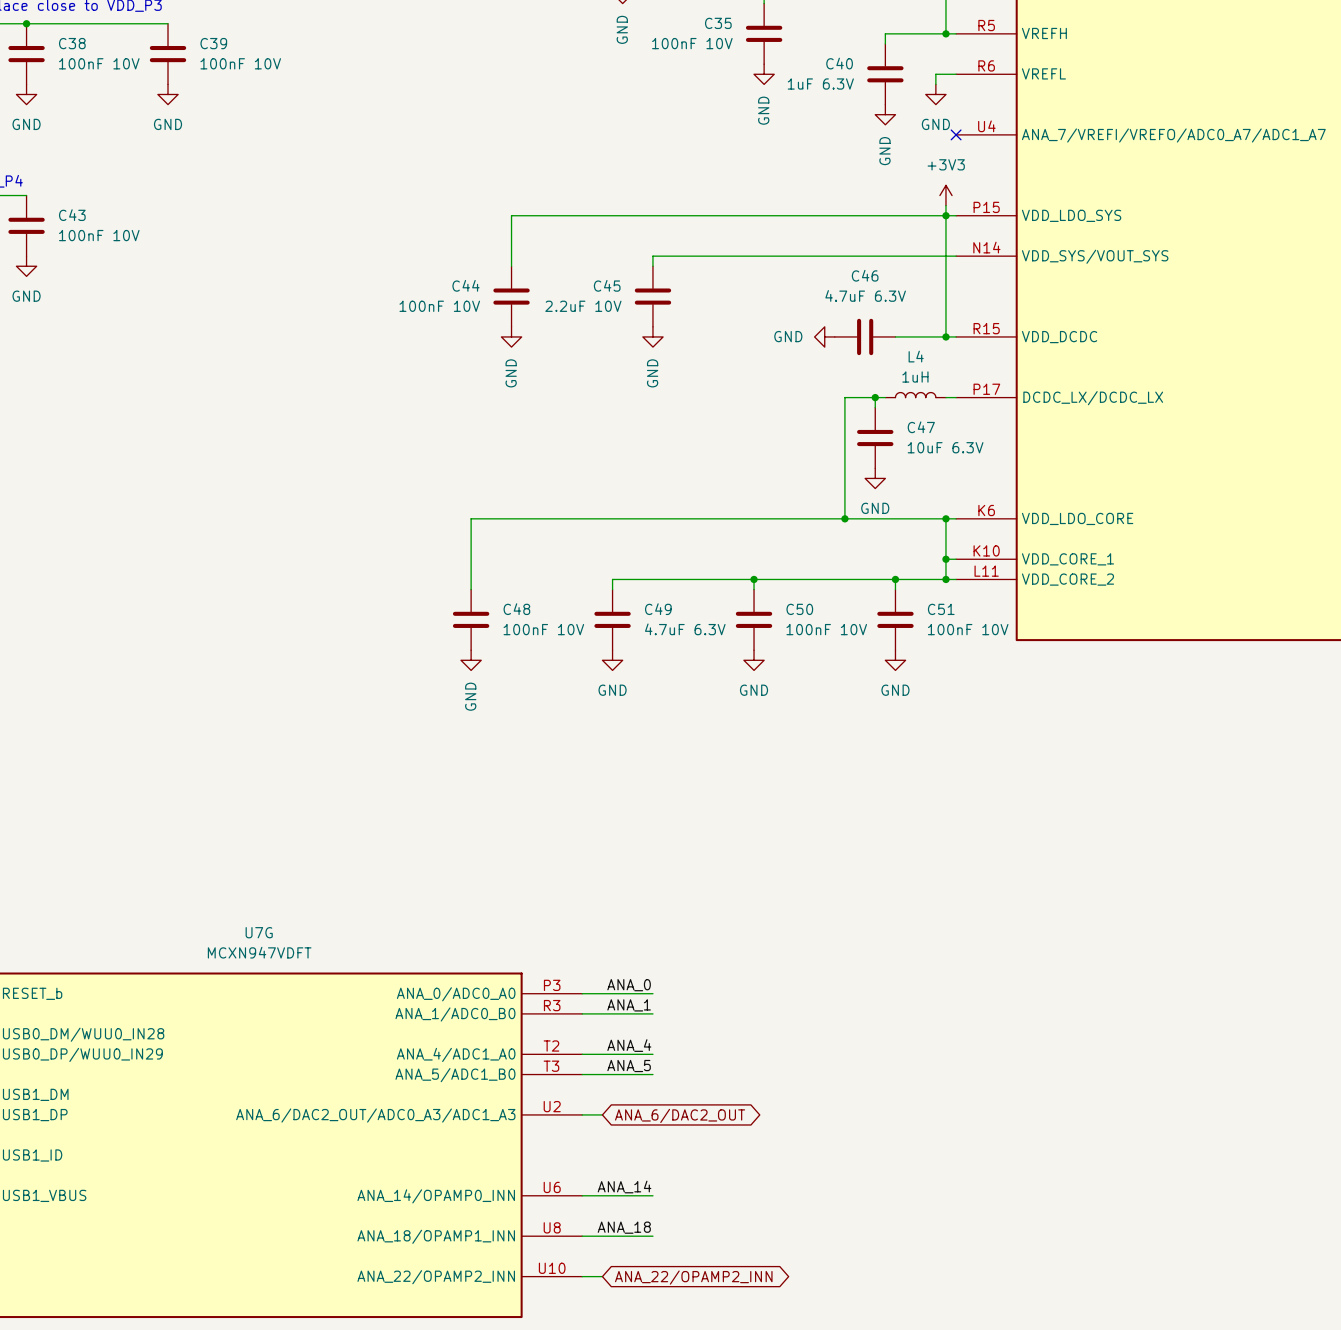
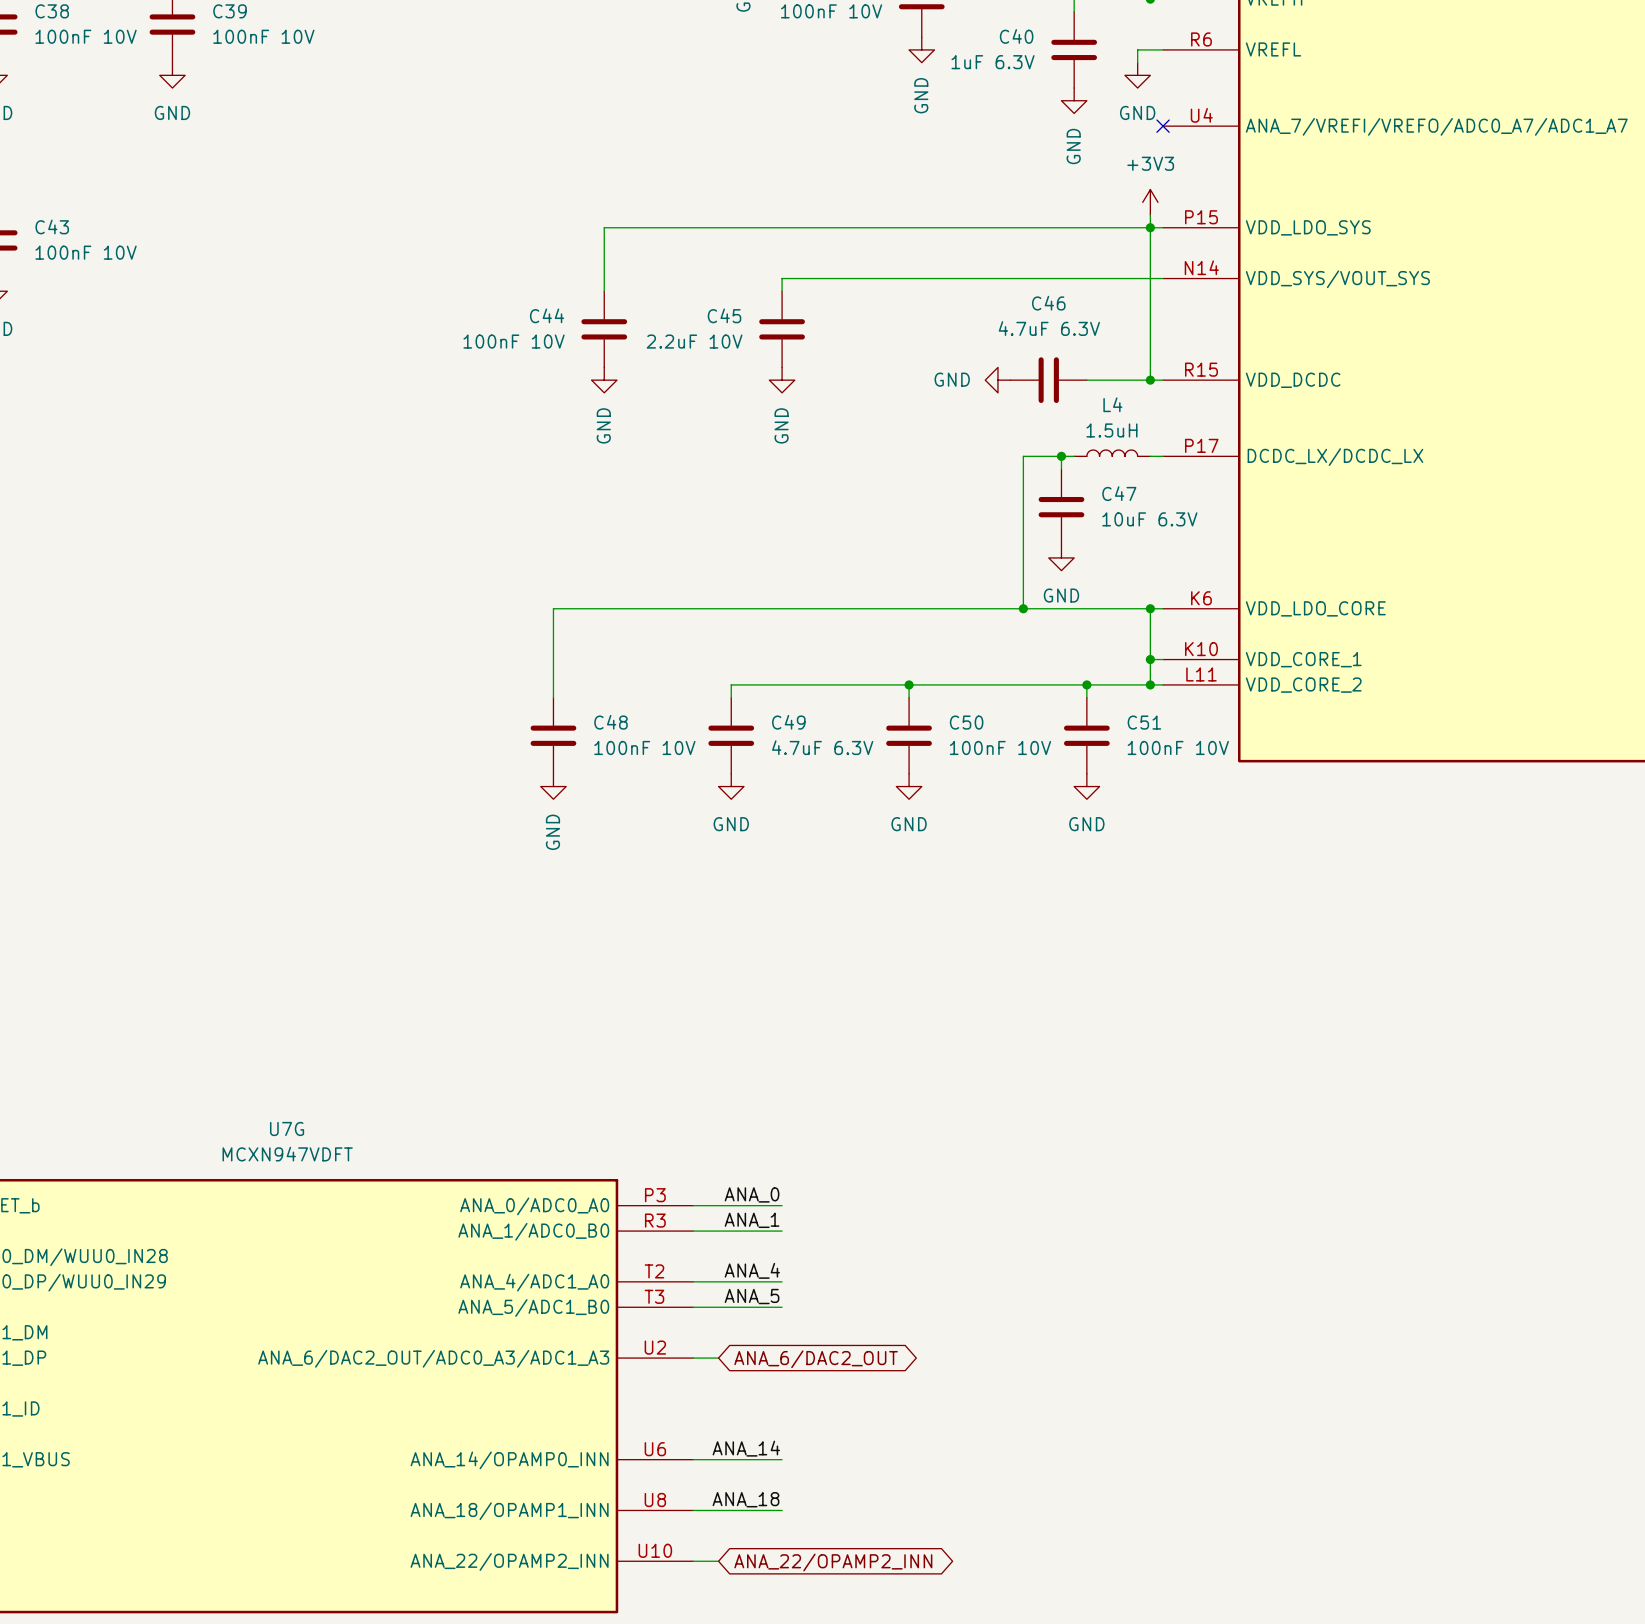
L4 value: 1uH (915, 377) -> 1.5uH (1111, 430)

